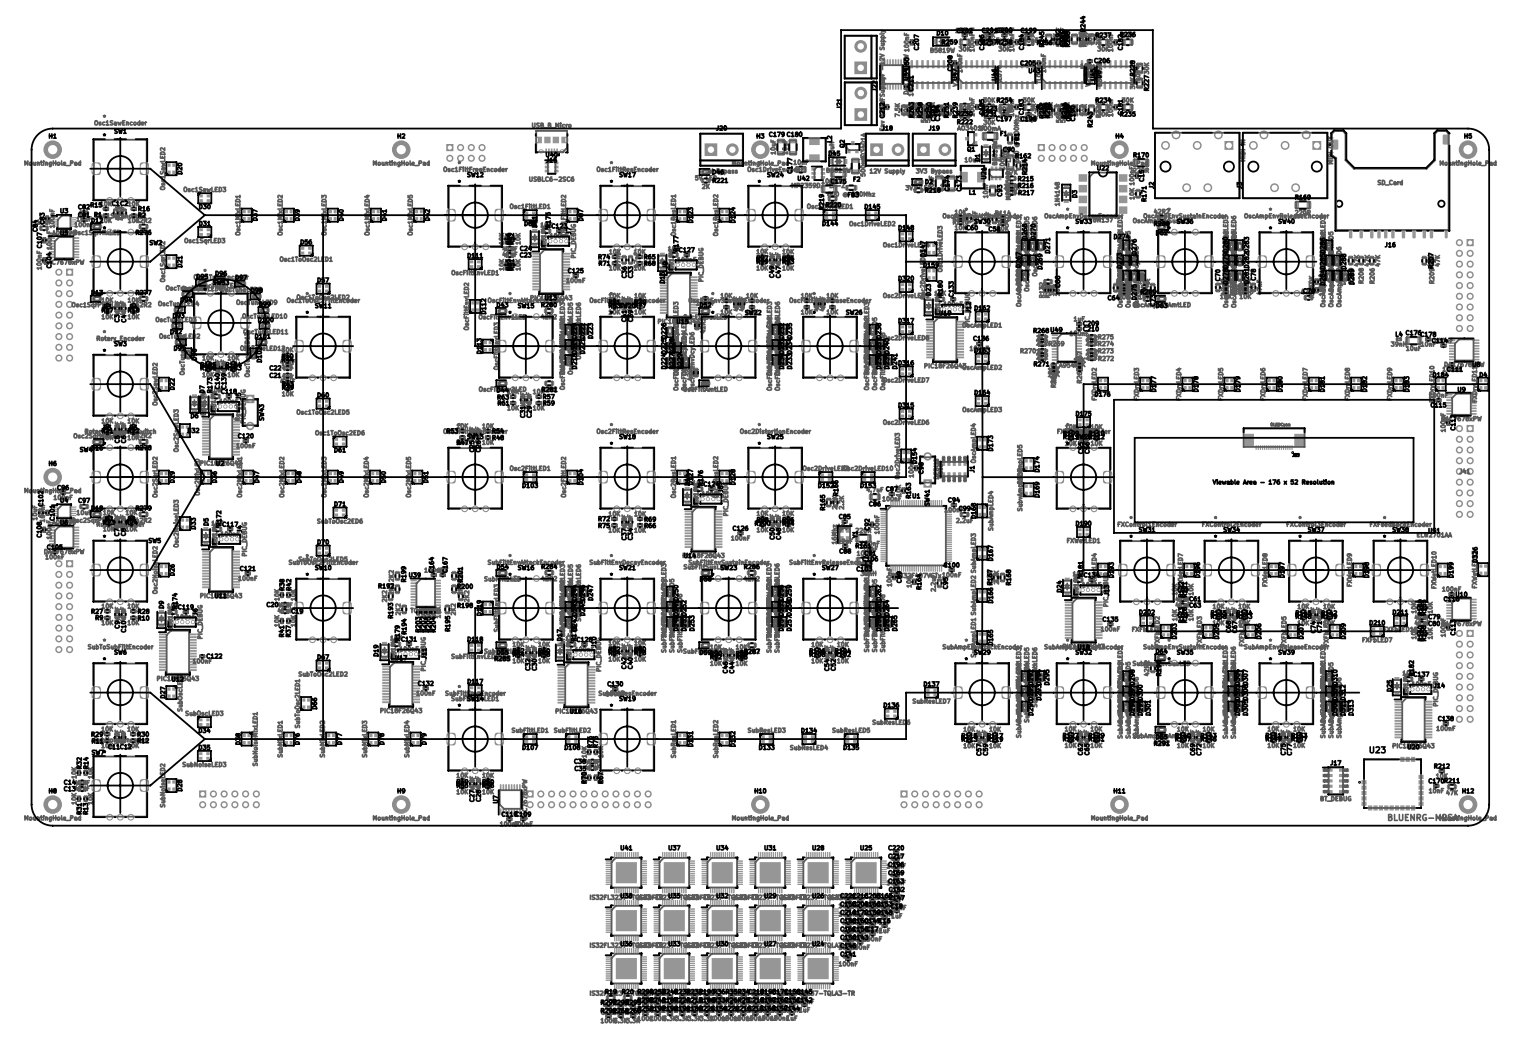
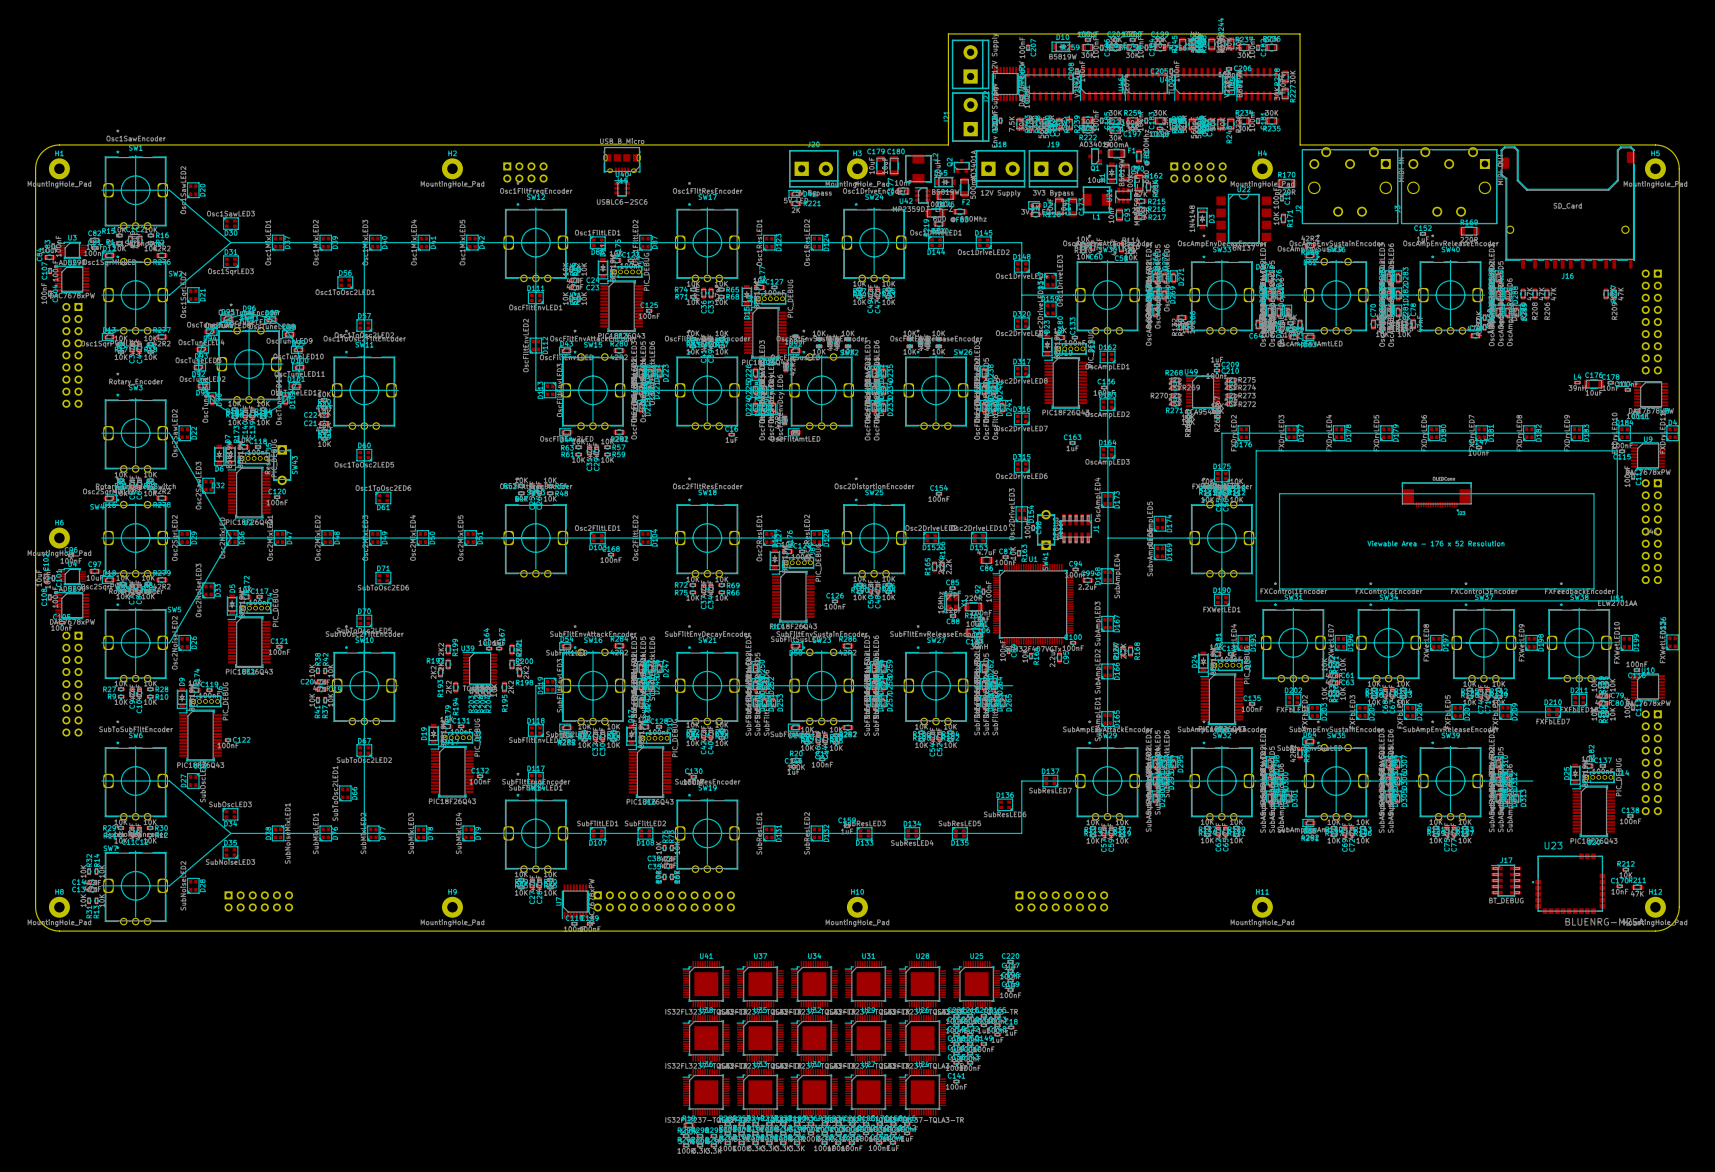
part position: (896, 886) -> (1072, 442)
part position: (896, 894) -> (1422, 233)
part position: (896, 902) -> (1478, 447)
part position: (872, 917) -> (847, 826)
part position: (884, 925) -> (731, 434)
part position: (872, 934) -> (822, 759)
part position: (848, 950) -> (793, 766)
part position: (627, 997) -> (796, 760)
part position: (719, 1013) -> (938, 493)
part position: (767, 1013) -> (611, 554)

